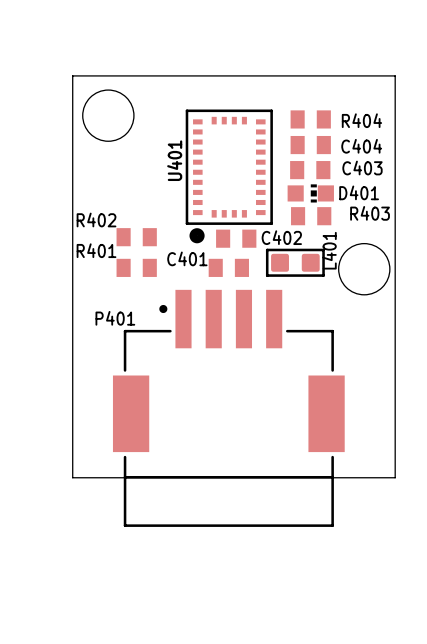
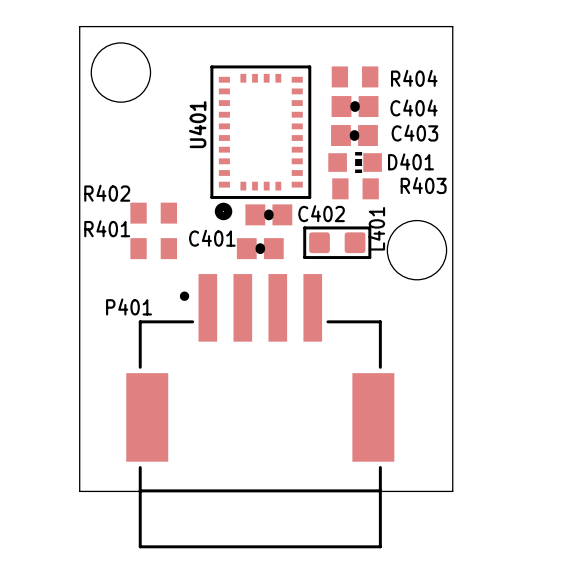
C404 footprint: [290, 135, 331, 155] -> [331, 96, 379, 118]
C403 footprint: [290, 161, 331, 180] -> [331, 125, 378, 147]
C402 footprint: [216, 229, 257, 248] -> [245, 204, 293, 226]
C401 footprint: [208, 258, 249, 277] -> [236, 238, 284, 260]

